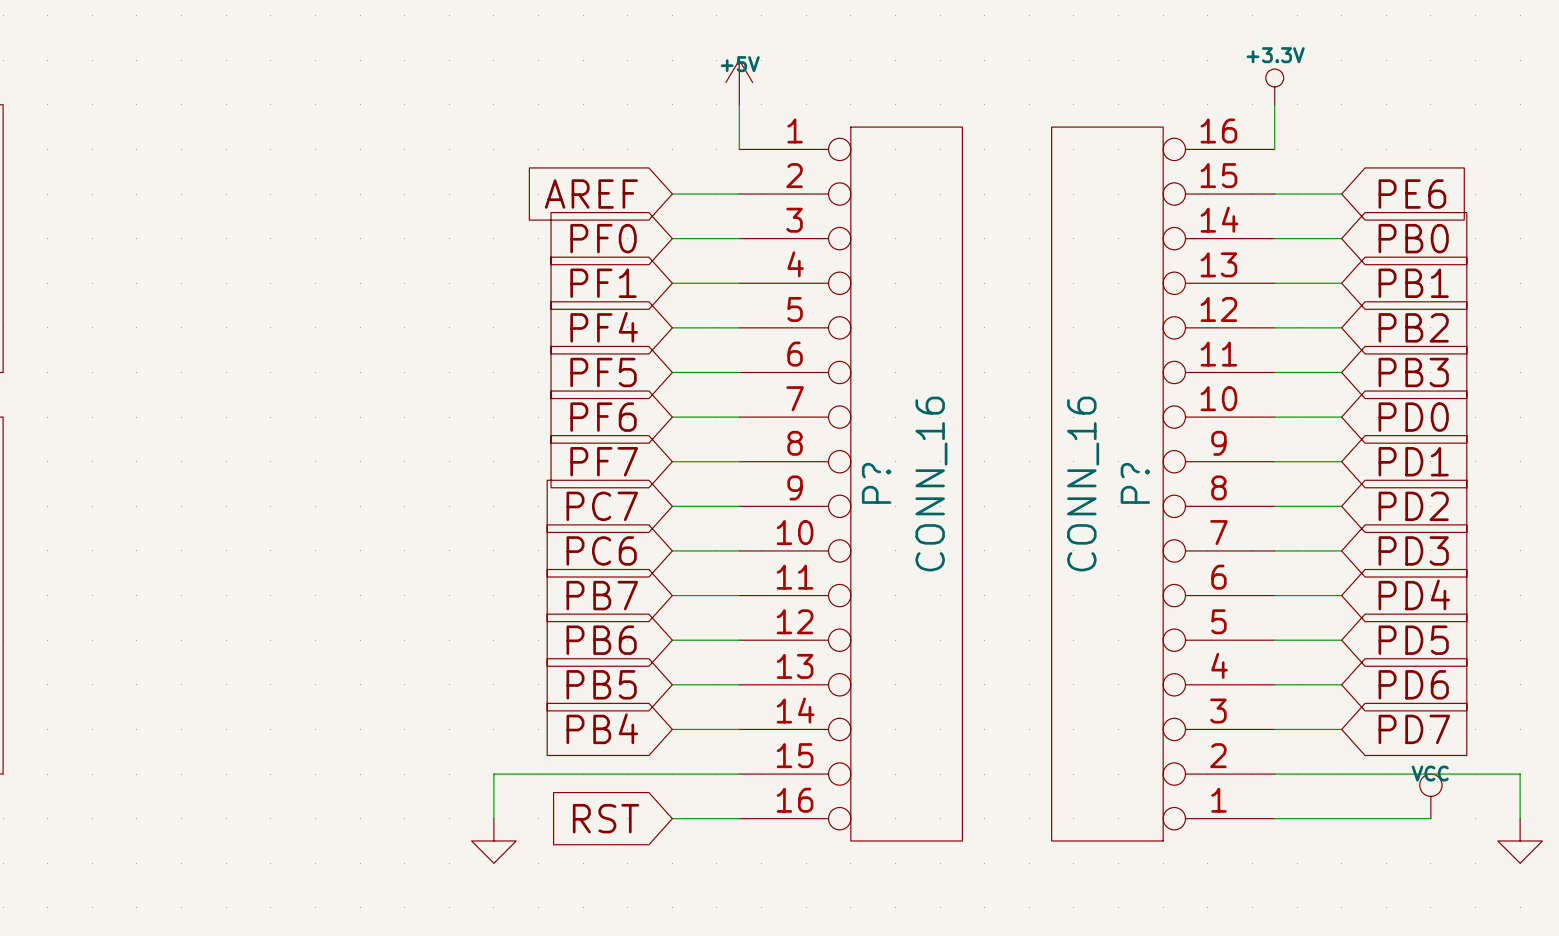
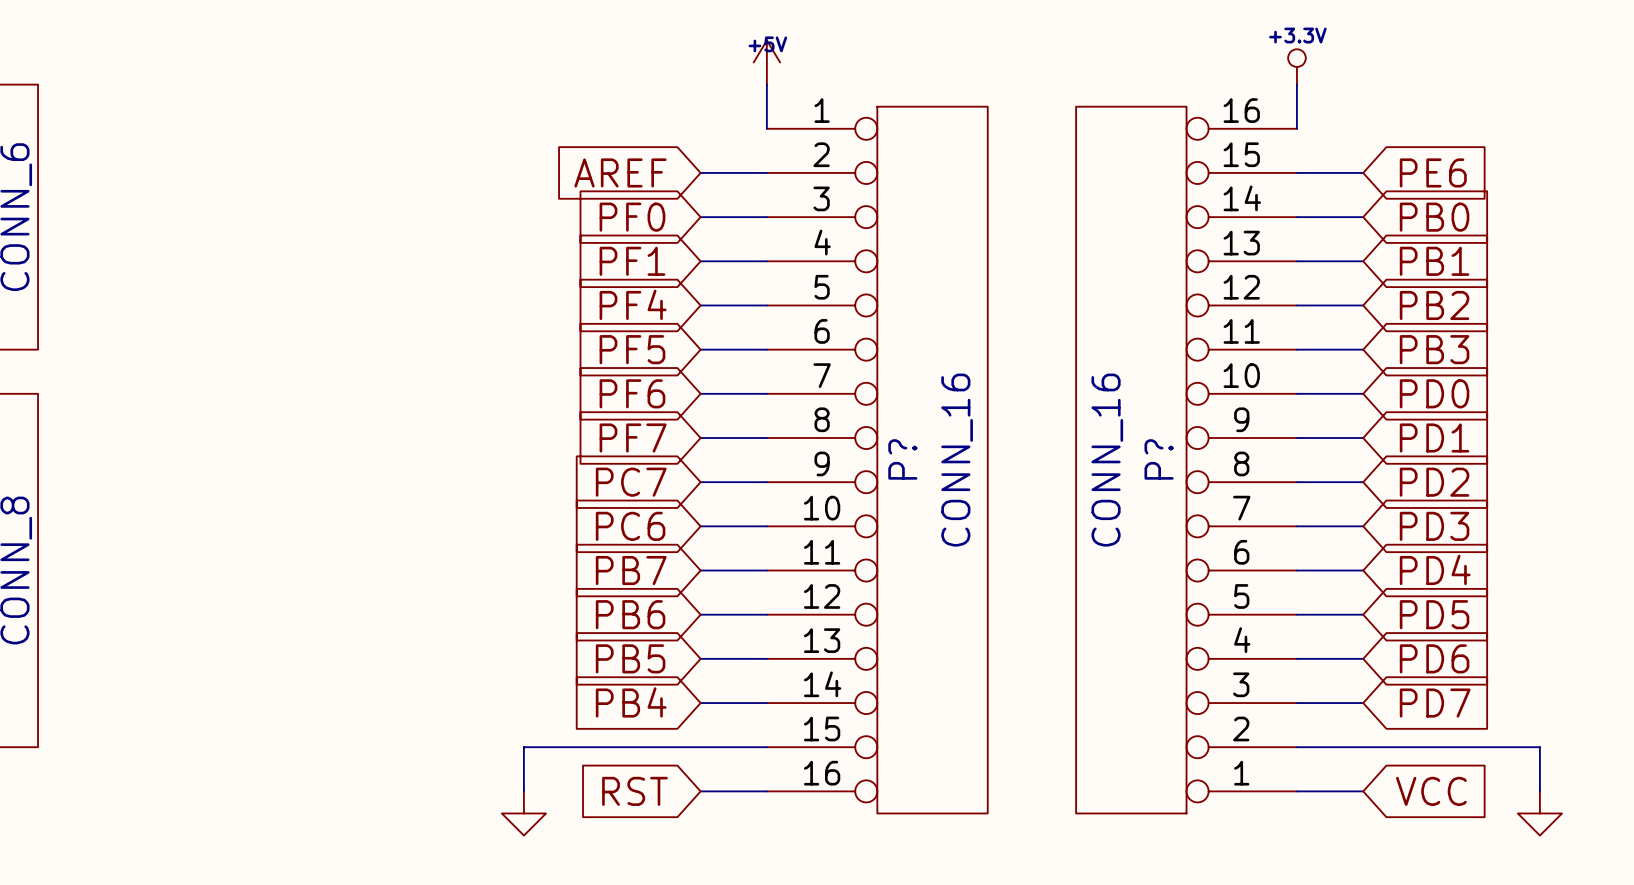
power symbol: VCC (1430, 796) -> none
wire: (1341, 818) (1430, 818) -> none
global label: none -> VCC (1431, 791)

